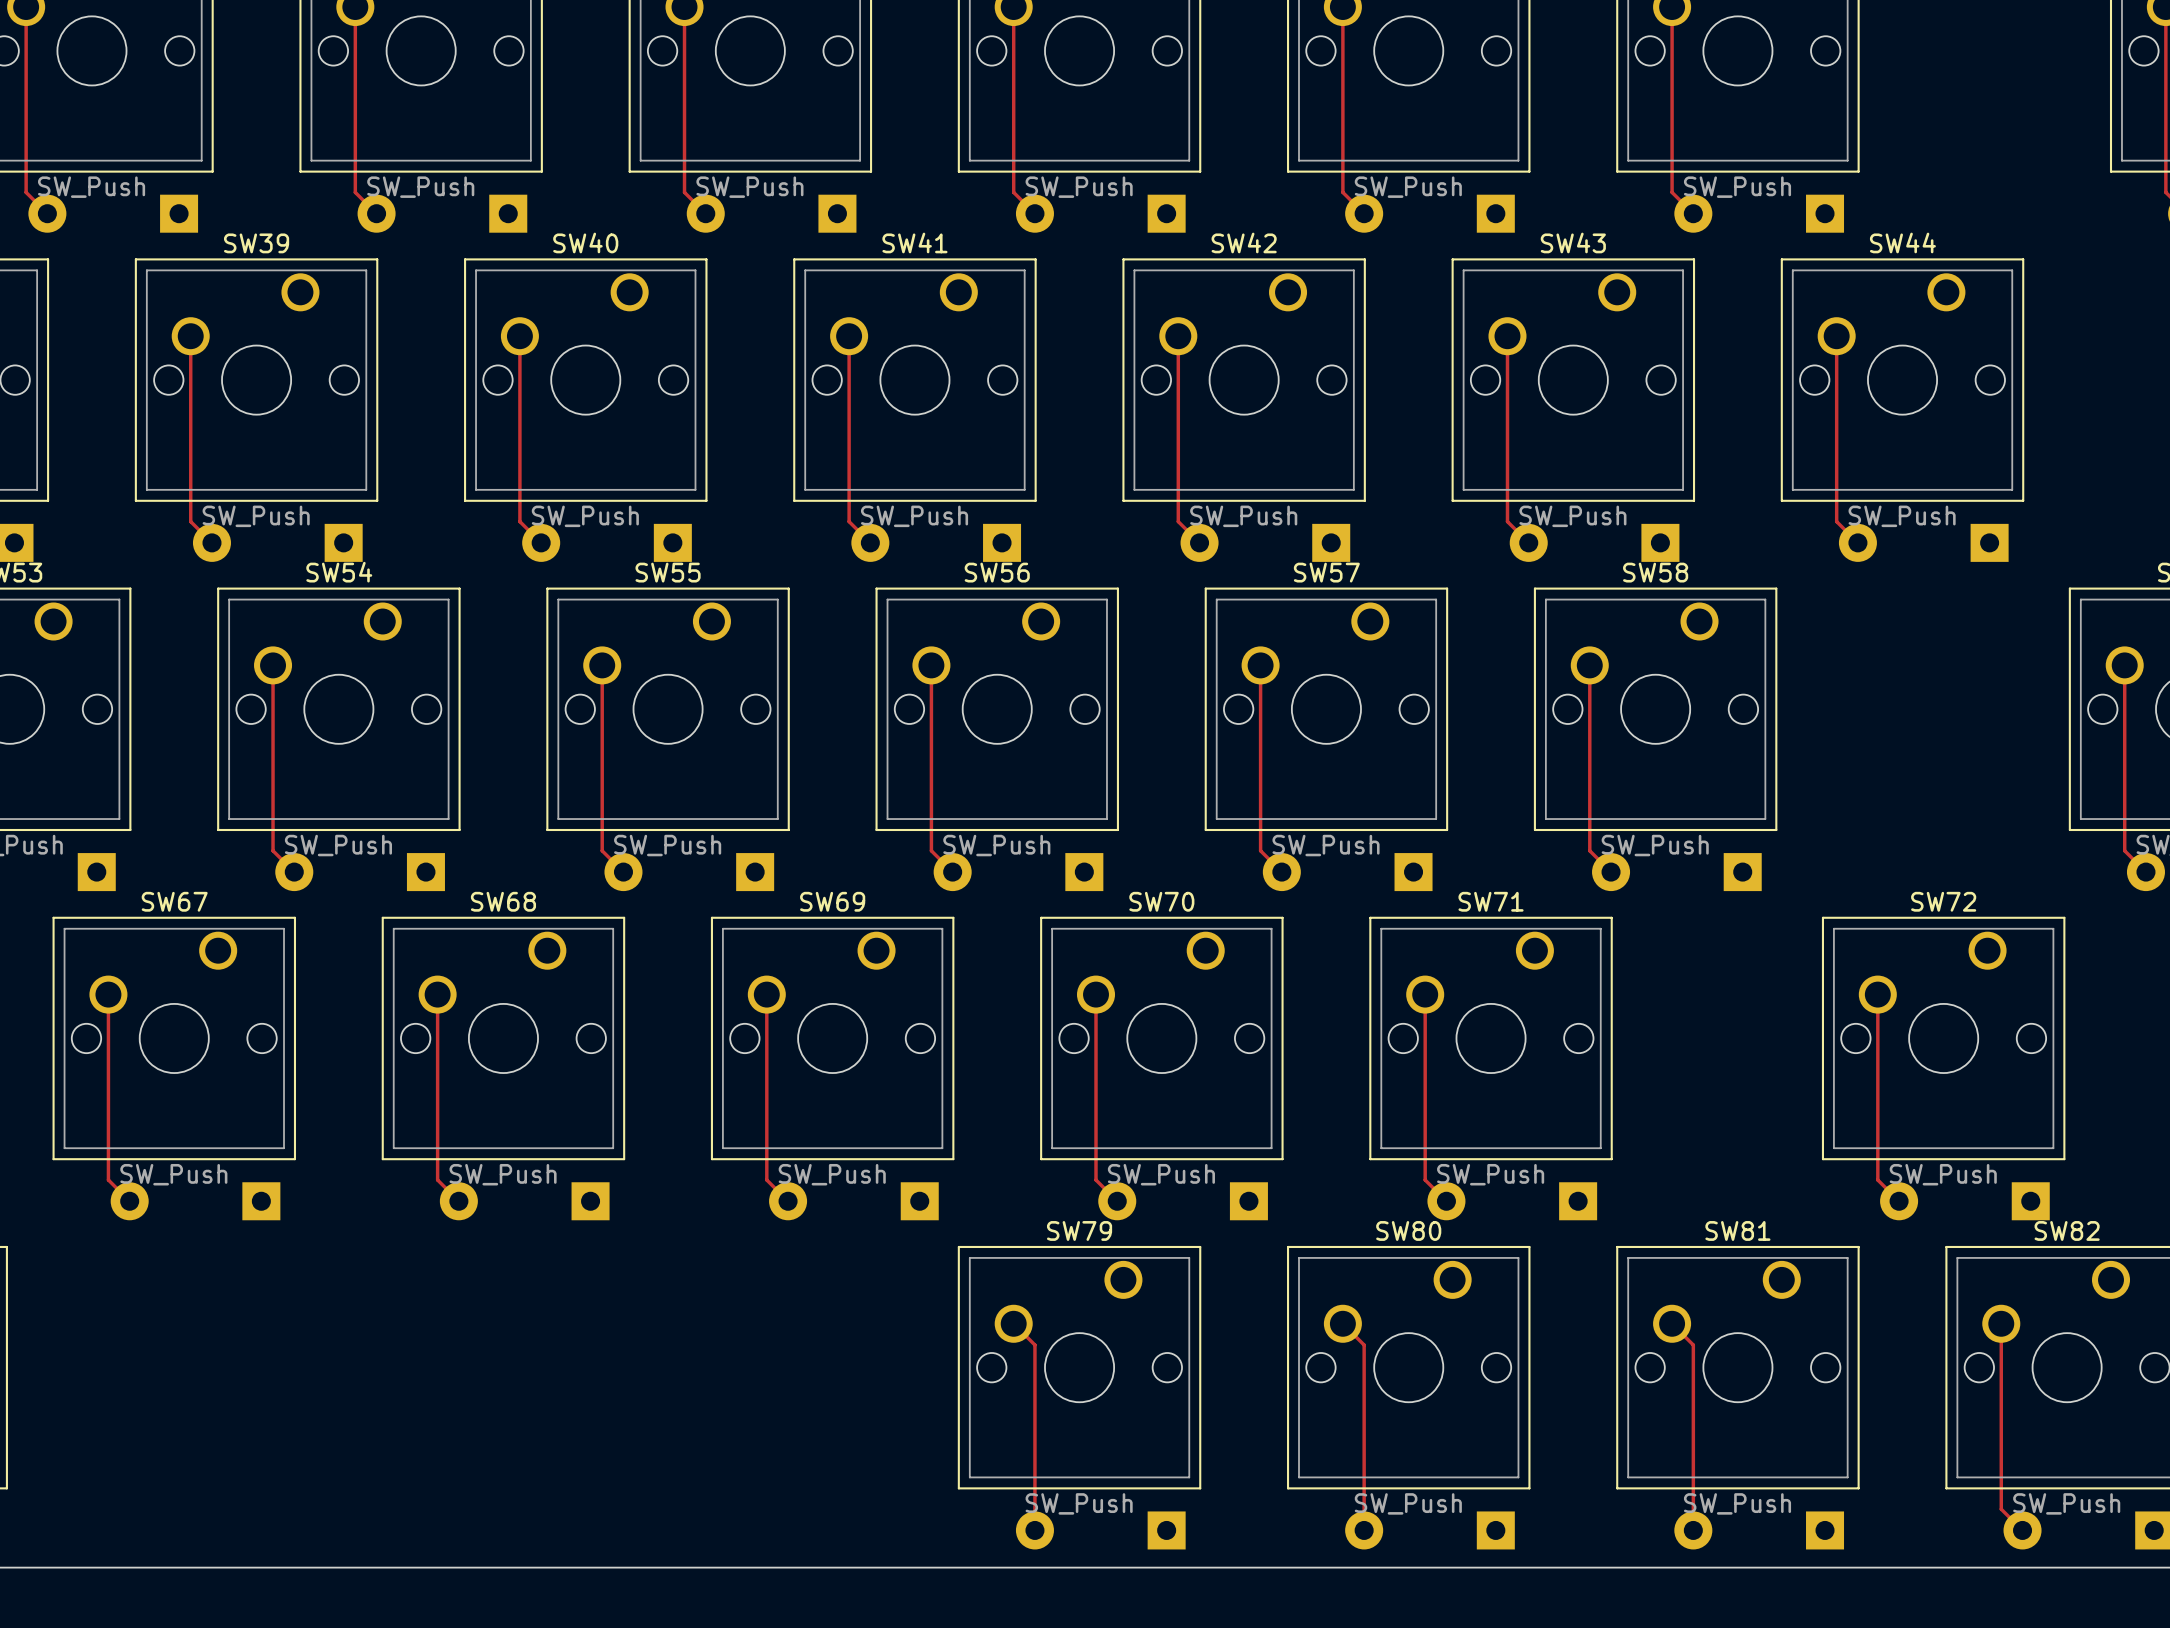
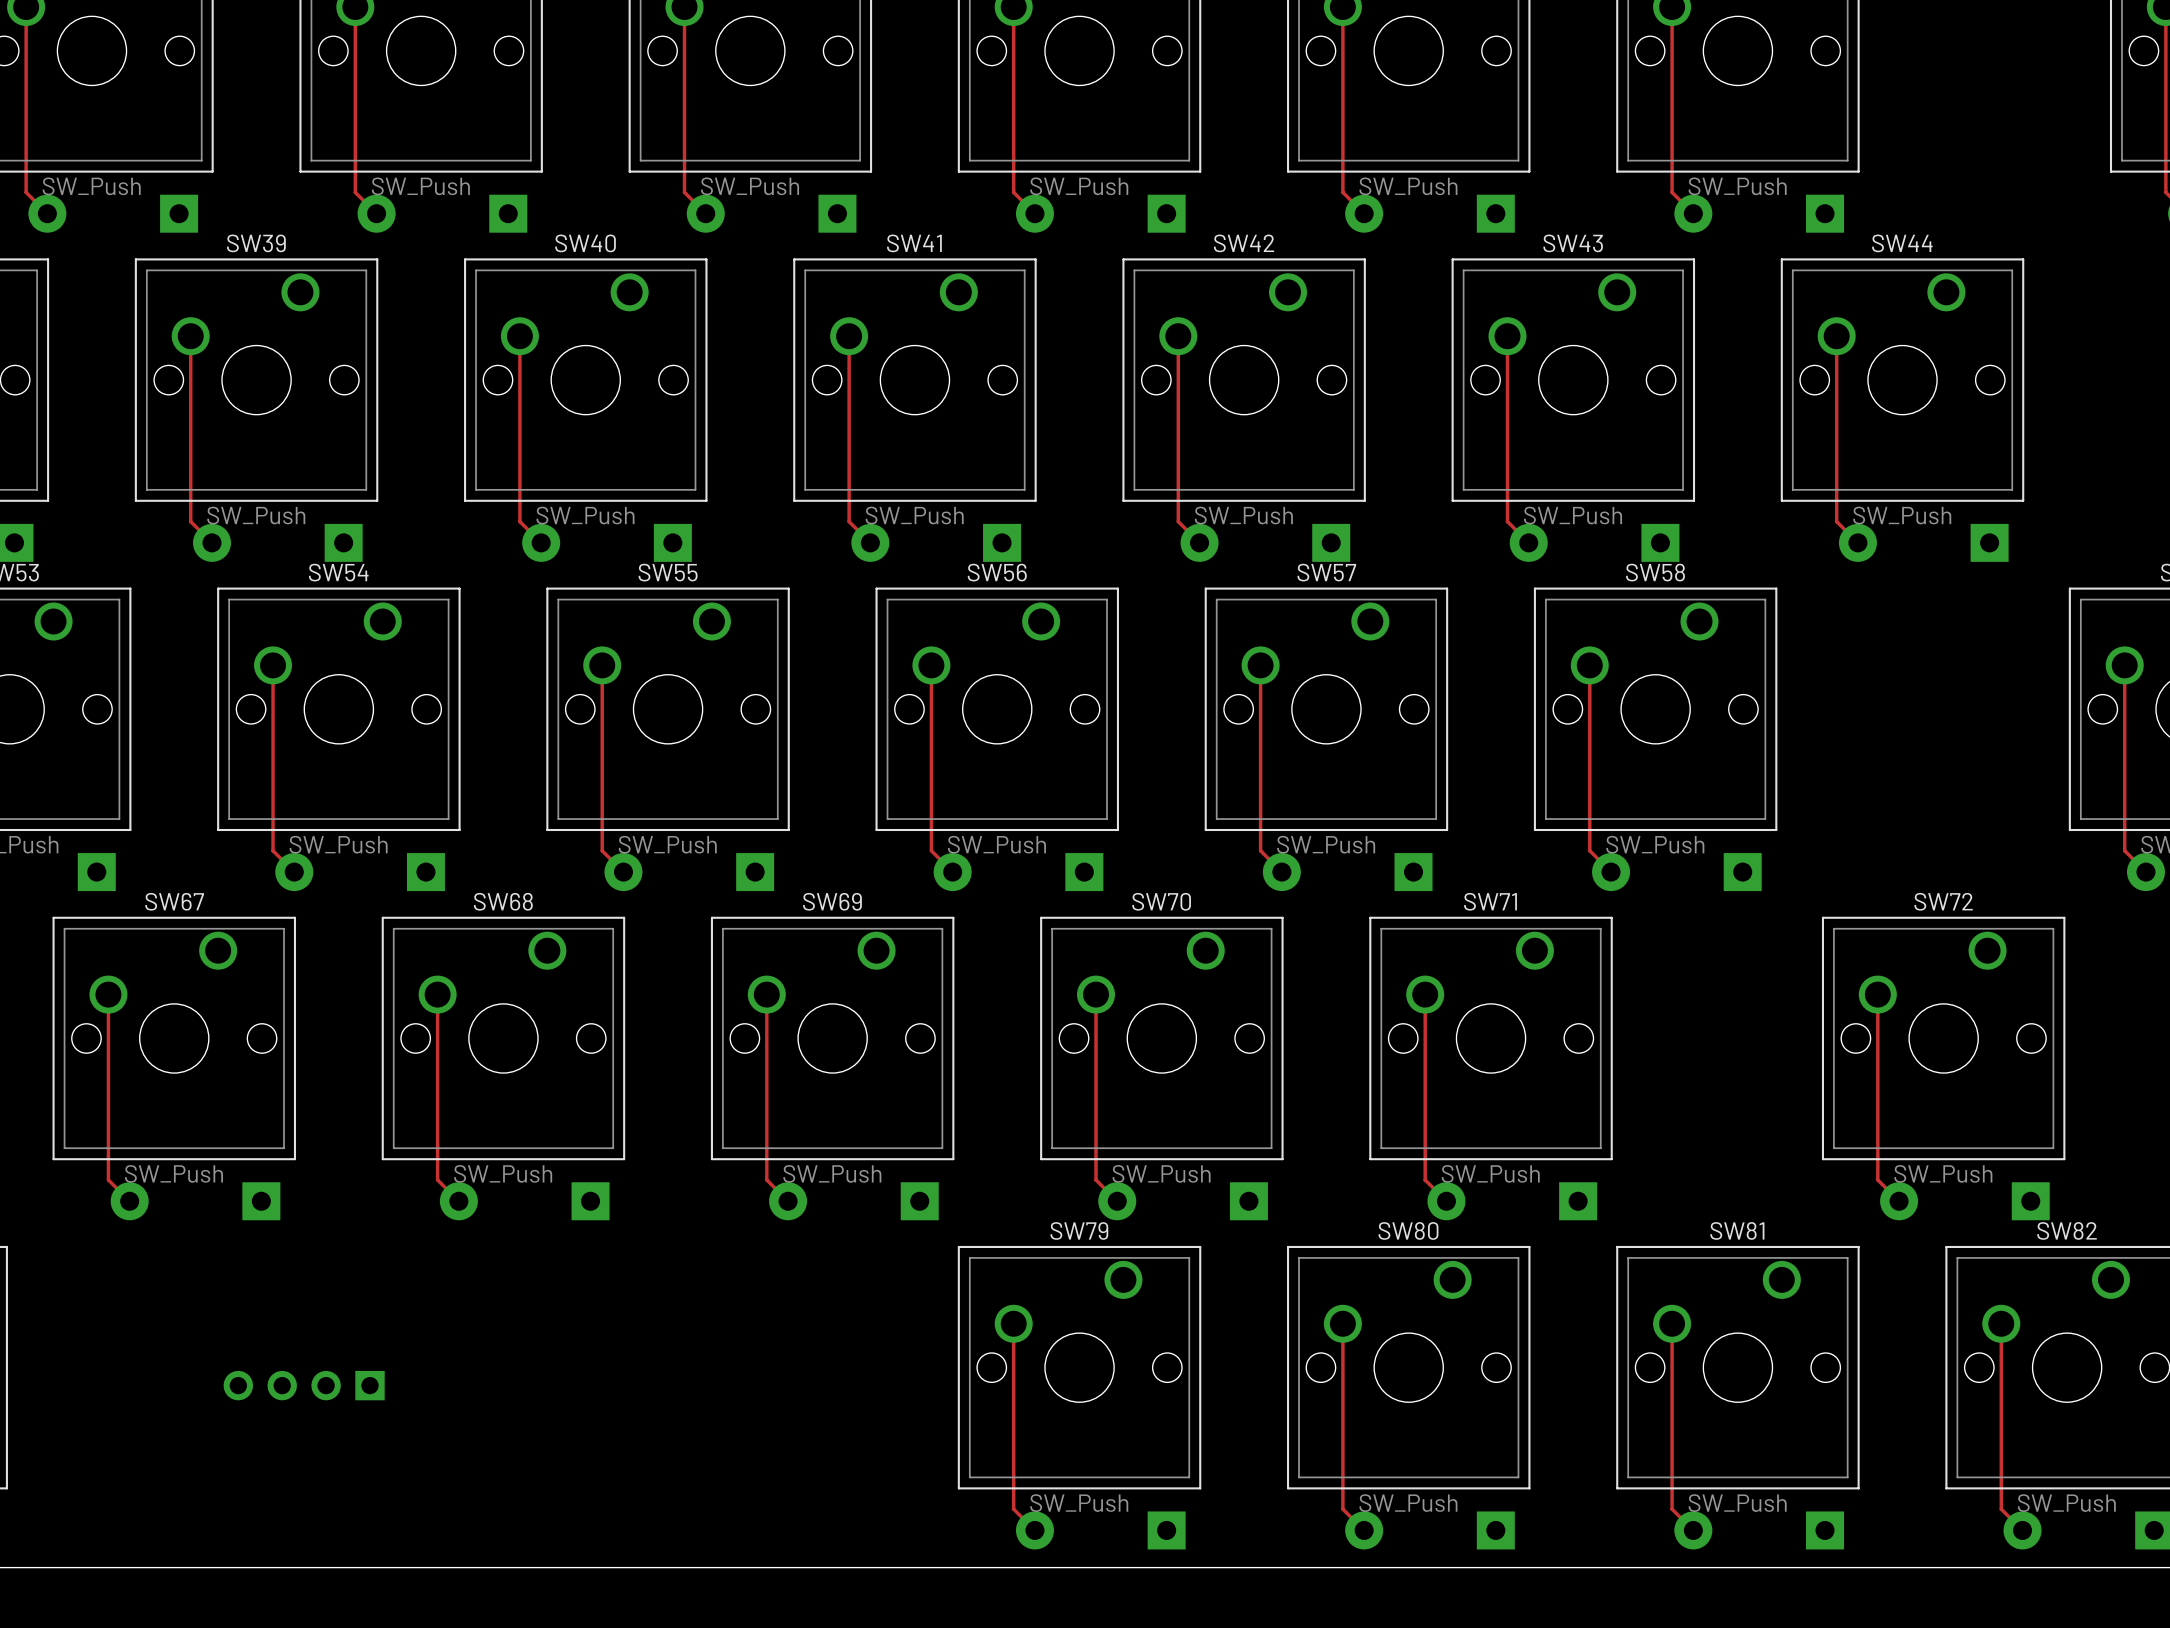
track: (1013, 1323) (1034, 1345) (1034, 1530) -> (1013, 1323) (1013, 1509) (1034, 1530)
track: (1342, 1323) (1364, 1345) (1364, 1530) -> (1342, 1323) (1342, 1509) (1364, 1530)
track: (1672, 1323) (1693, 1345) (1693, 1530) -> (1672, 1323) (1672, 1509) (1693, 1530)
part: none -> (304, 1385)

